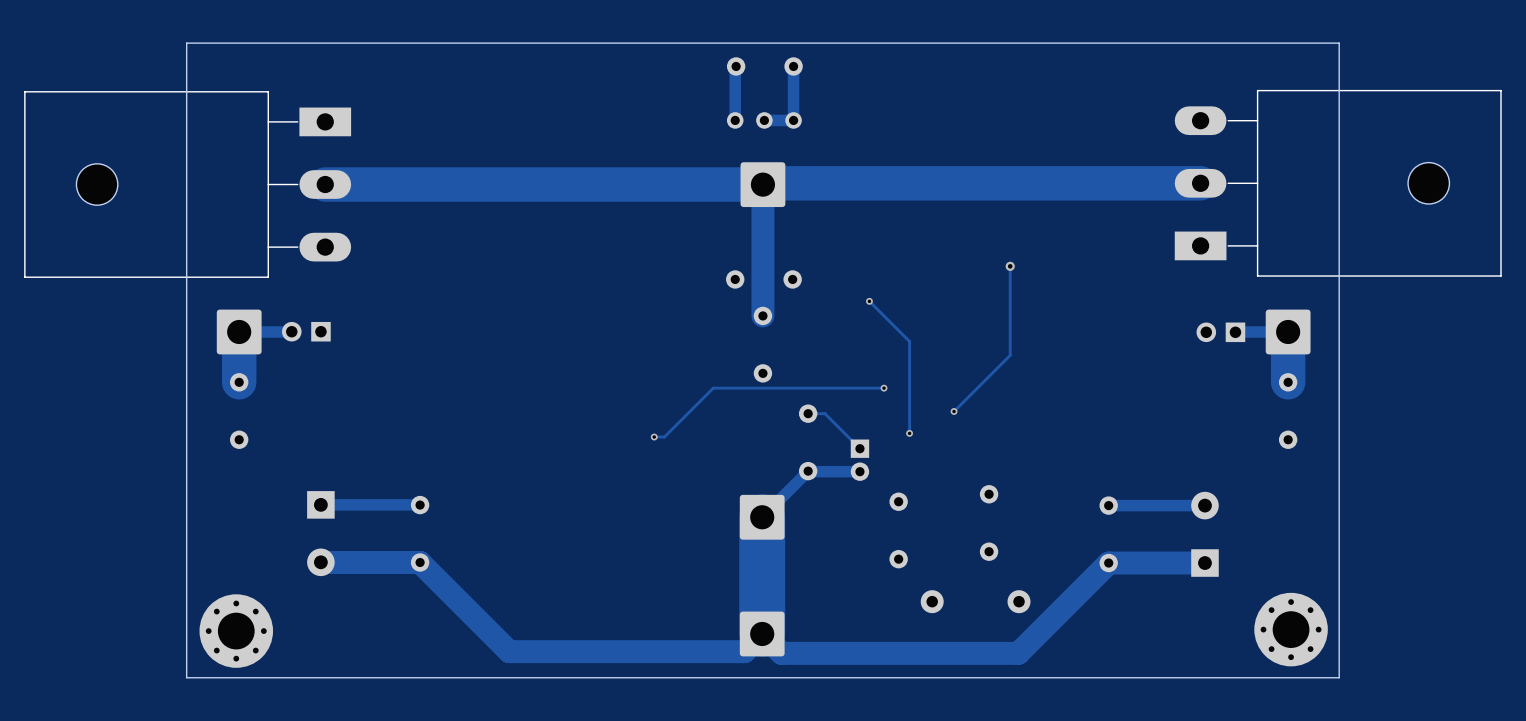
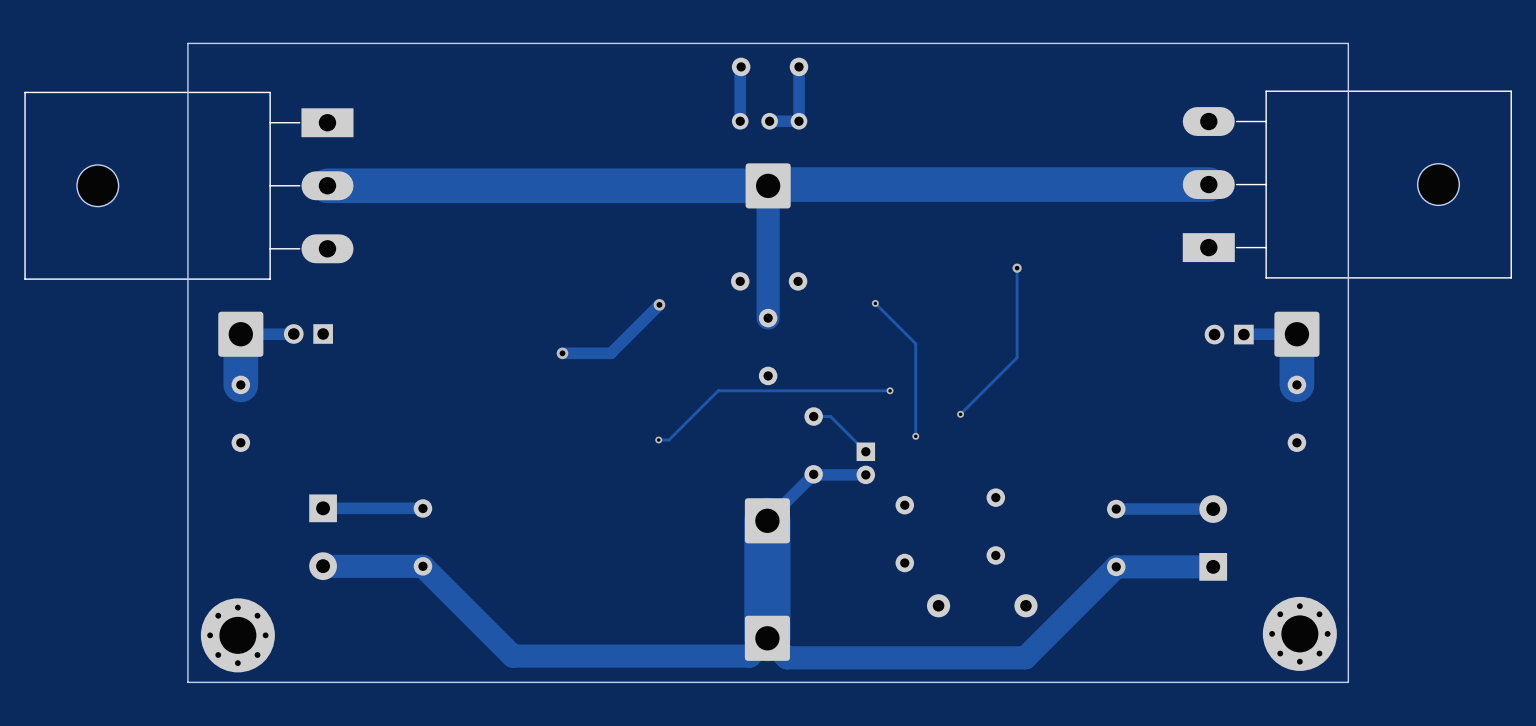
track: none -> (659, 304) (610, 353) (562, 353)
via: none -> (659, 304)
via: none -> (562, 353)

